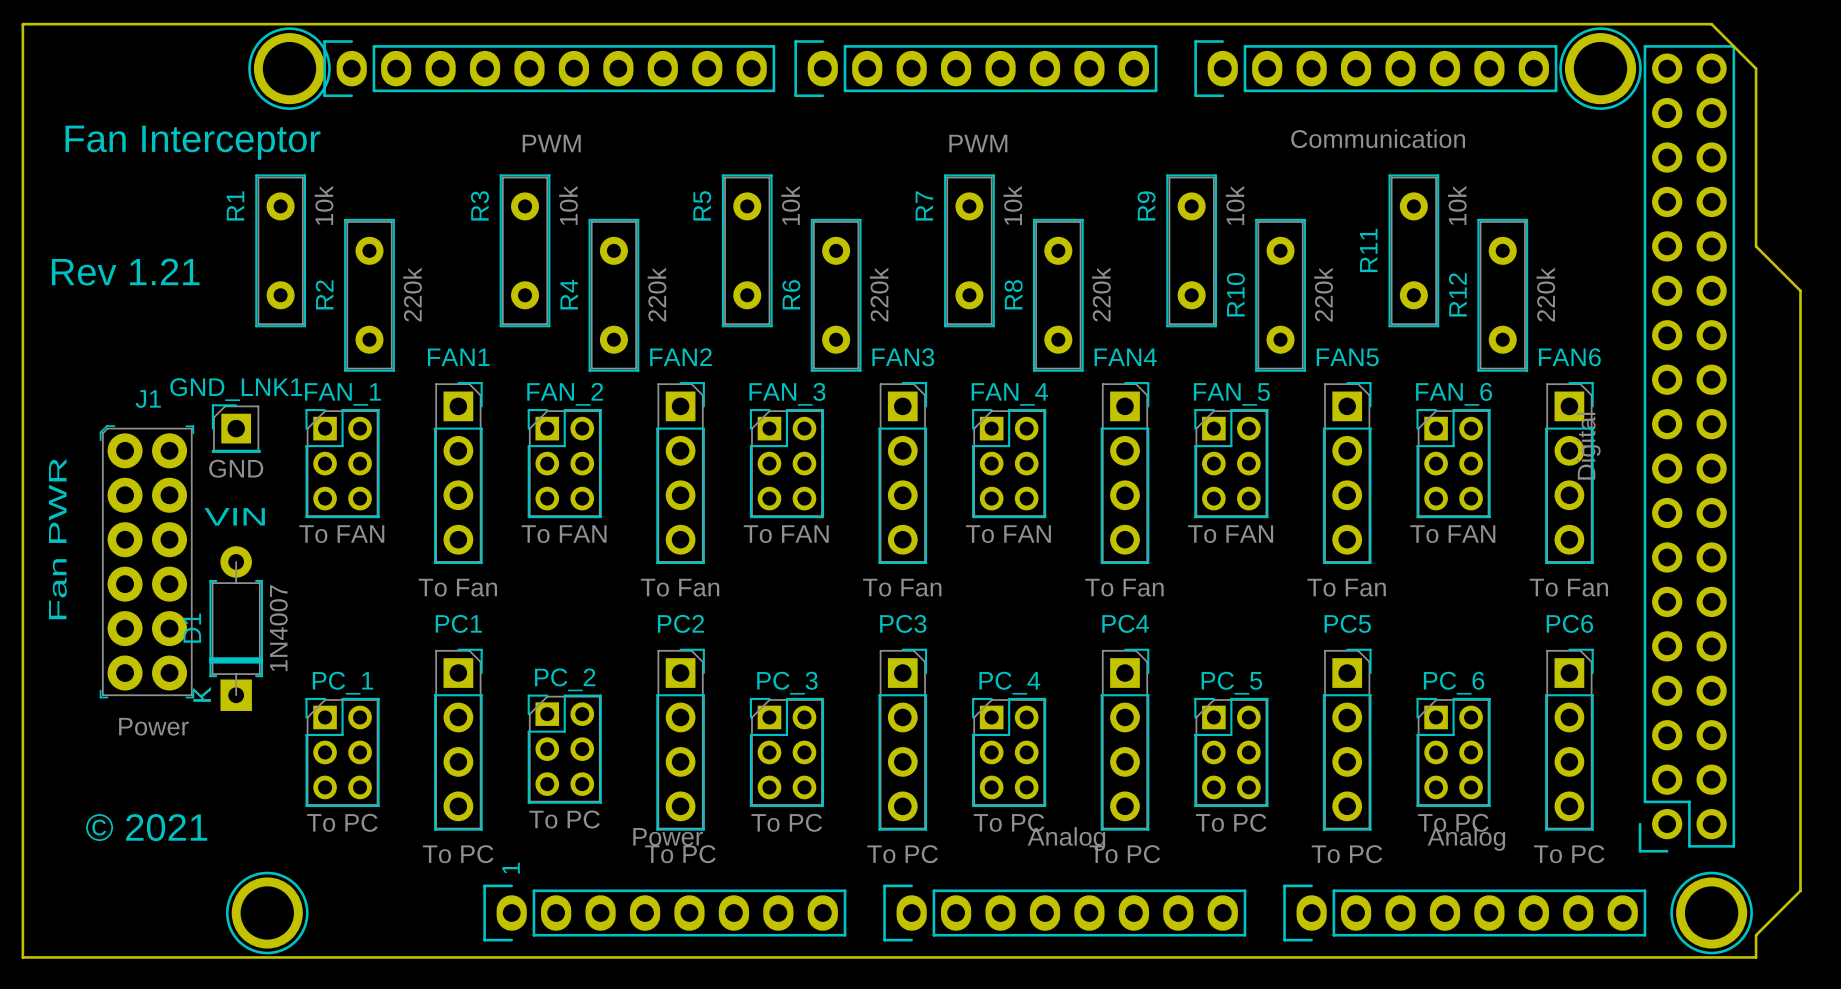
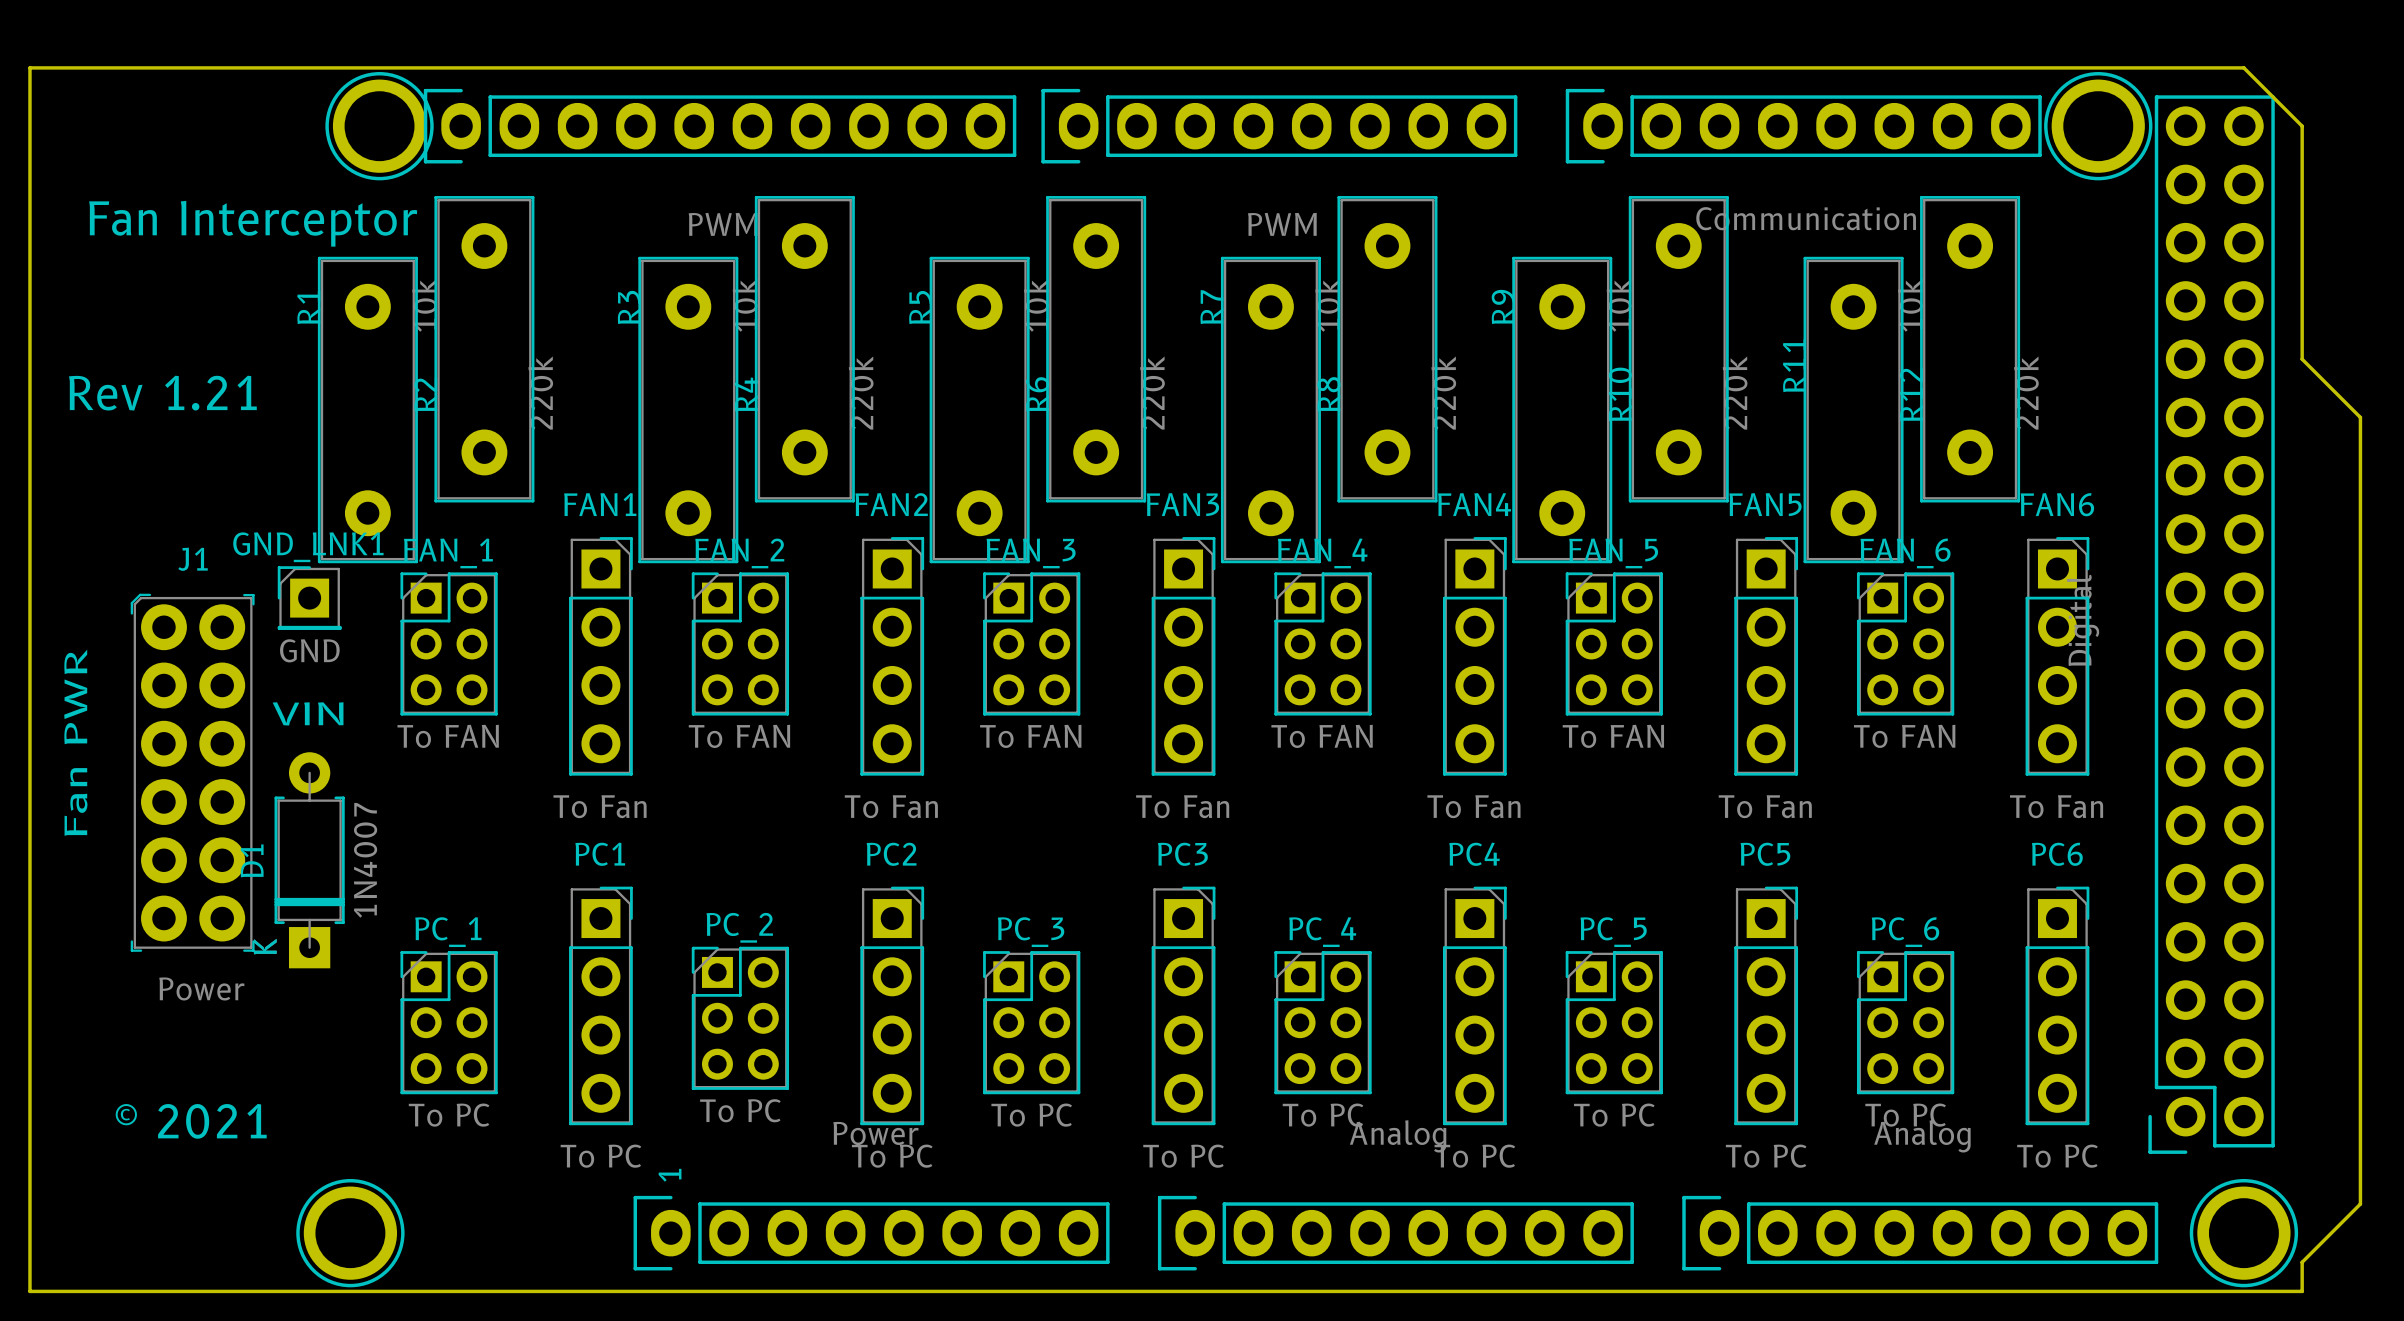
R1 footprint: [255, 174, 306, 328] -> [317, 256, 418, 564]
R3 footprint: [499, 174, 551, 328] -> [638, 256, 739, 564]
R5 footprint: [721, 174, 773, 328] -> [929, 256, 1030, 564]
R7 footprint: [944, 174, 995, 328] -> [1220, 256, 1321, 564]
R9 footprint: [1166, 174, 1218, 328] -> [1512, 256, 1613, 564]
R11 footprint: [1388, 174, 1440, 328] -> [1803, 256, 1904, 564]
R2 footprint: [344, 218, 395, 372] -> [434, 196, 535, 503]
R4 footprint: [588, 218, 640, 372] -> [754, 196, 855, 503]
R6 footprint: [810, 218, 862, 372] -> [1046, 196, 1147, 503]
R8 footprint: [1032, 218, 1084, 372] -> [1337, 196, 1438, 503]
R10 footprint: [1255, 218, 1306, 372] -> [1628, 196, 1729, 503]
R12 footprint: [1477, 218, 1529, 372] -> [1920, 196, 2021, 503]

